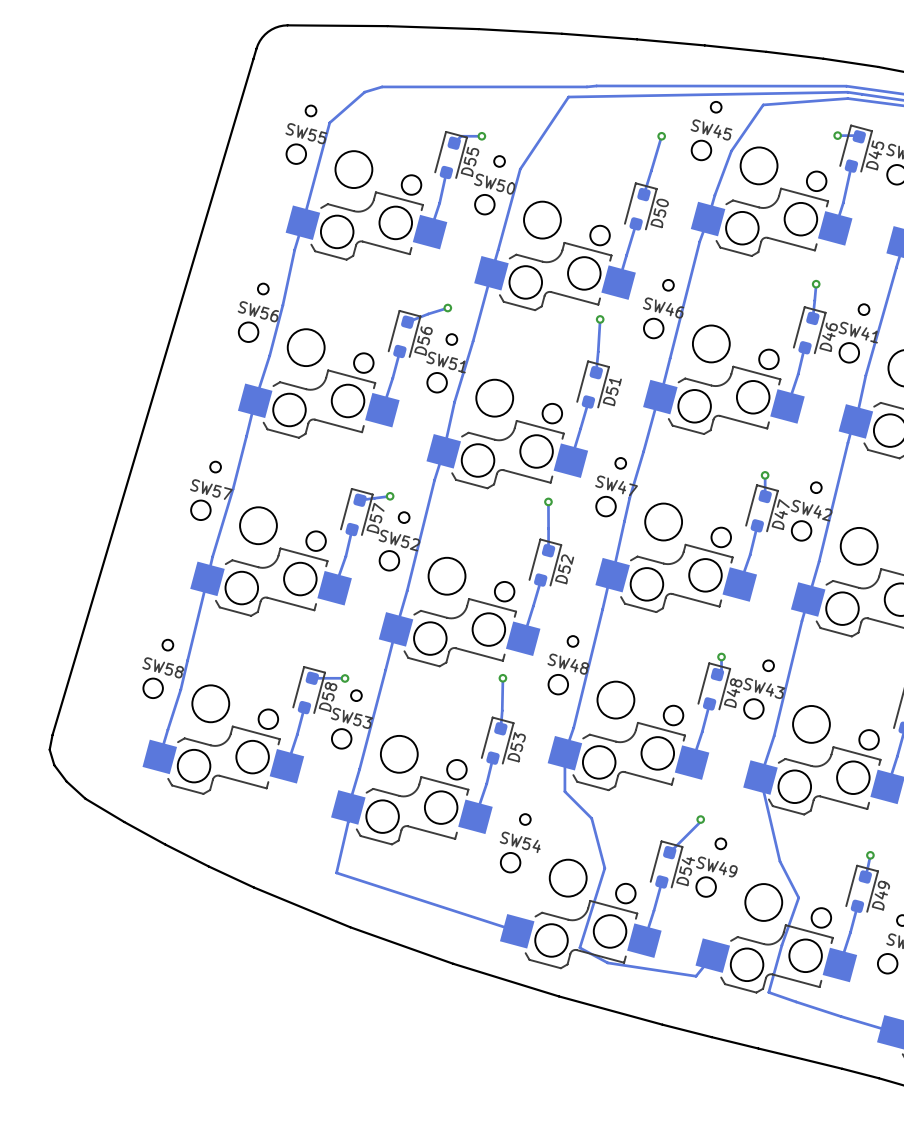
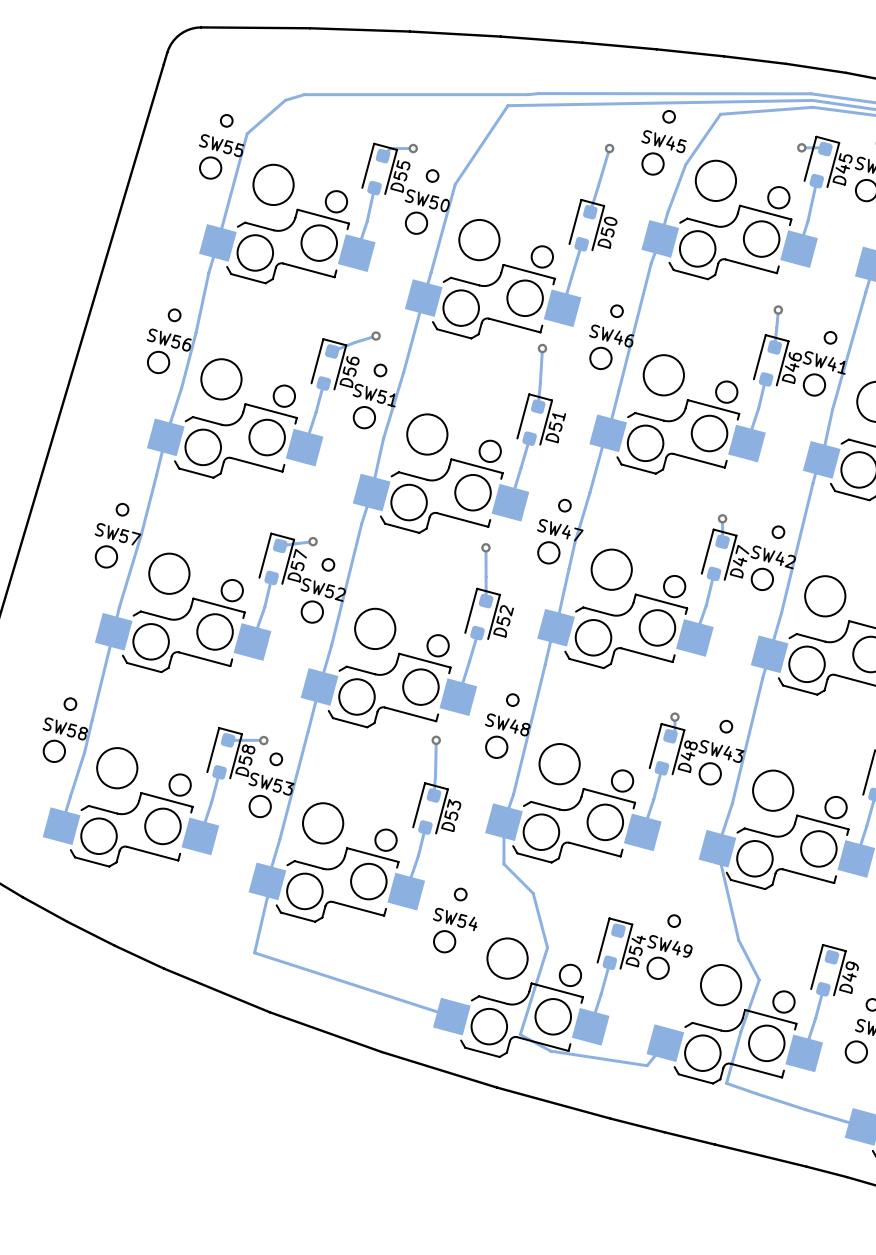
track: (700, 819) (669, 852) -> none
via: (700, 819) -> none
track: (870, 855) (865, 876) -> none
via: (870, 855) -> none

